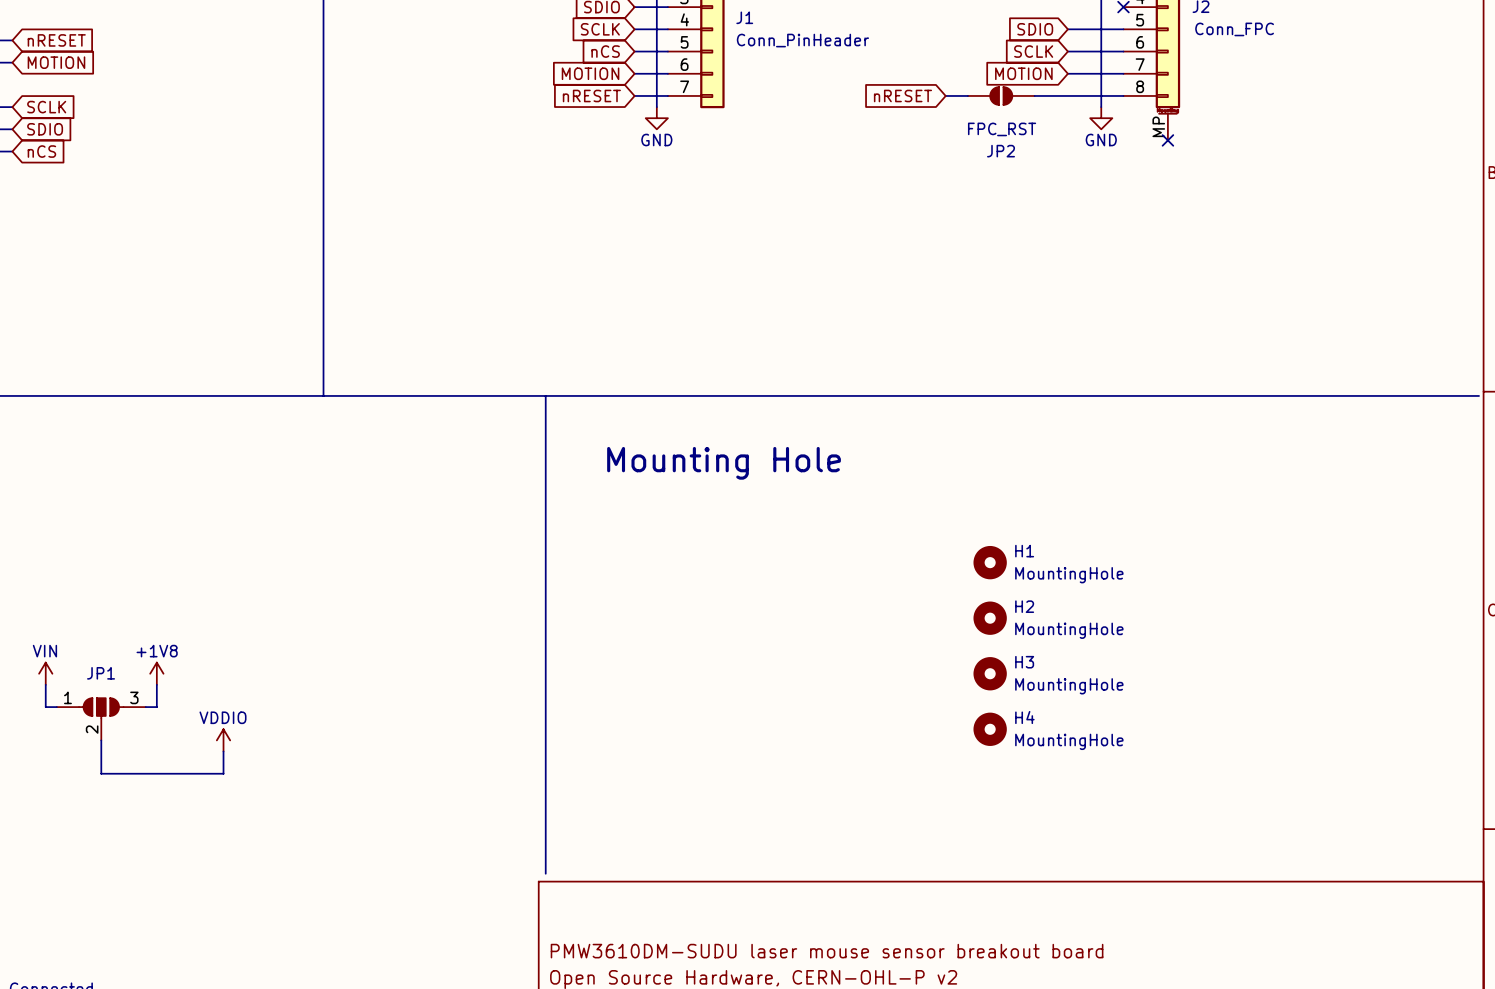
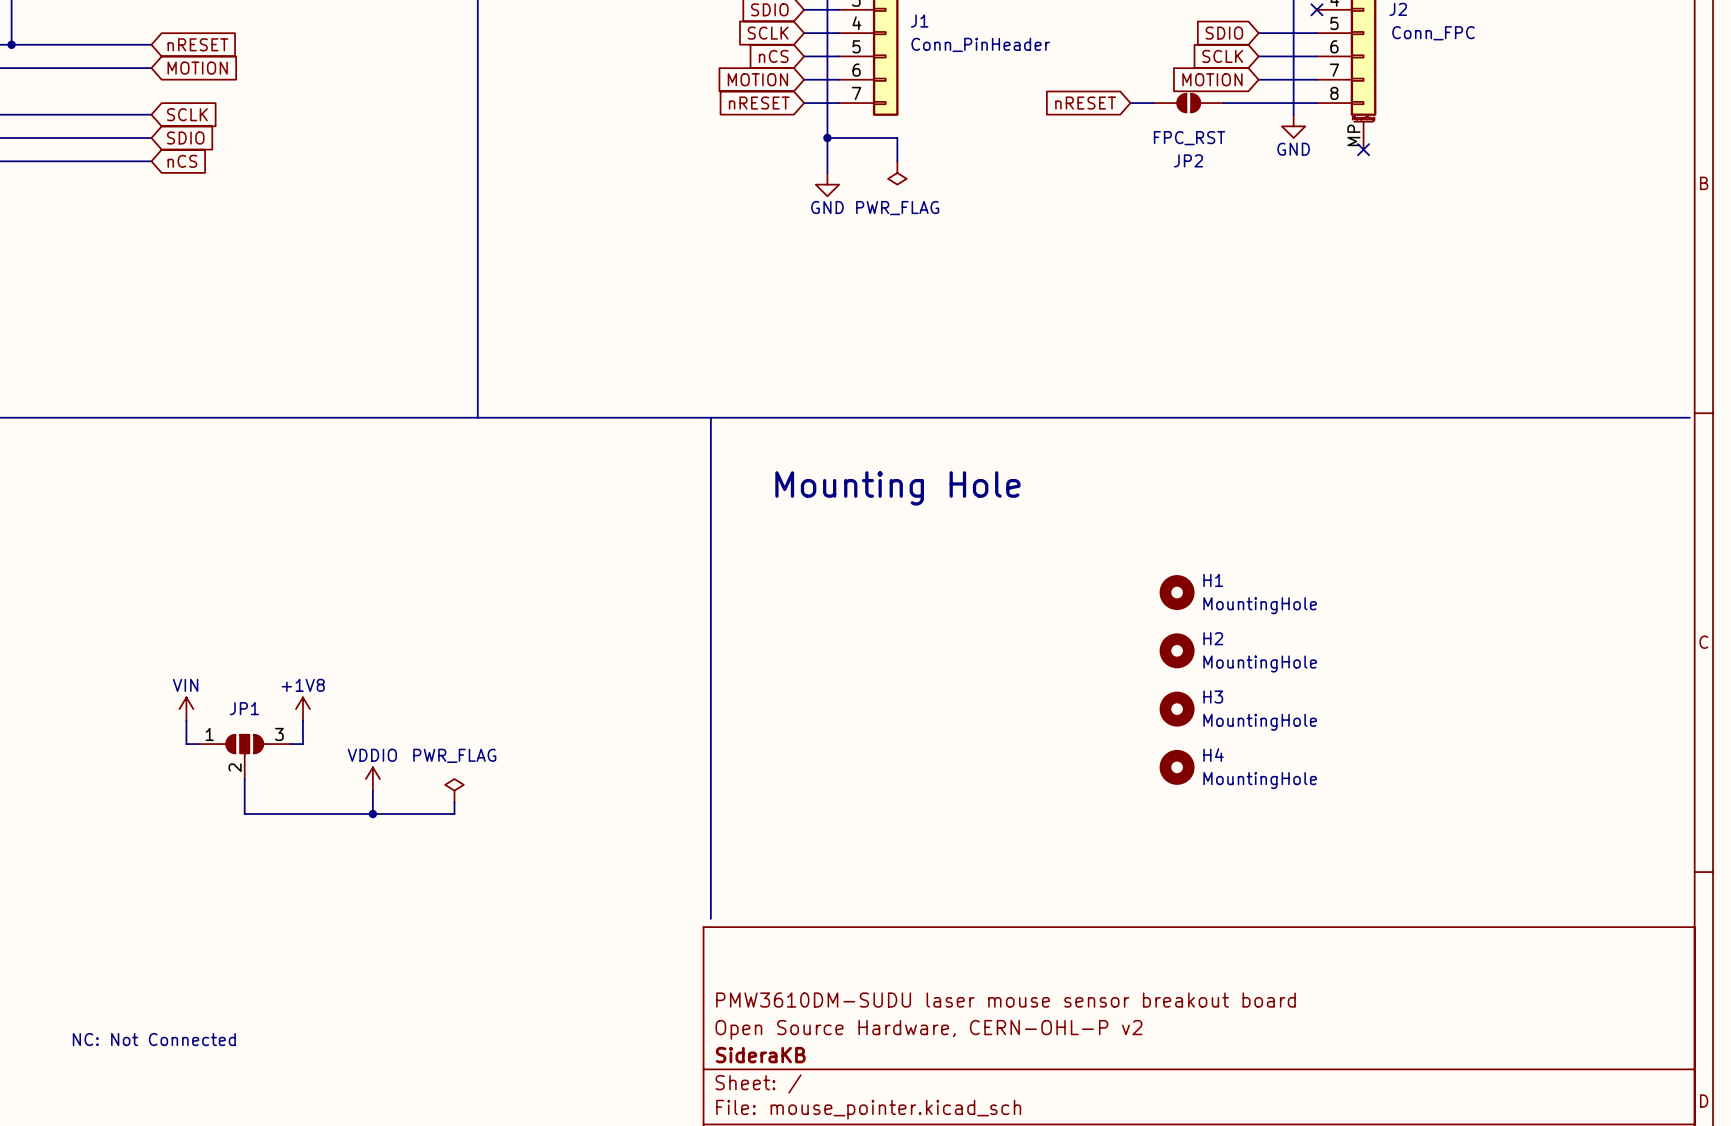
wire: none -> (827, 114) (827, 172)
power symbol position: GND (656, 118) -> GND (827, 184)
wire: none -> (827, 138) (897, 138) (897, 161)
junction: none -> (827, 138)
power symbol: none -> PWR_FLAG (897, 172)
power symbol: none -> PWR_FLAG (454, 790)
wire: none -> (454, 802) (454, 813) (372, 813)
junction: none -> (372, 813)

